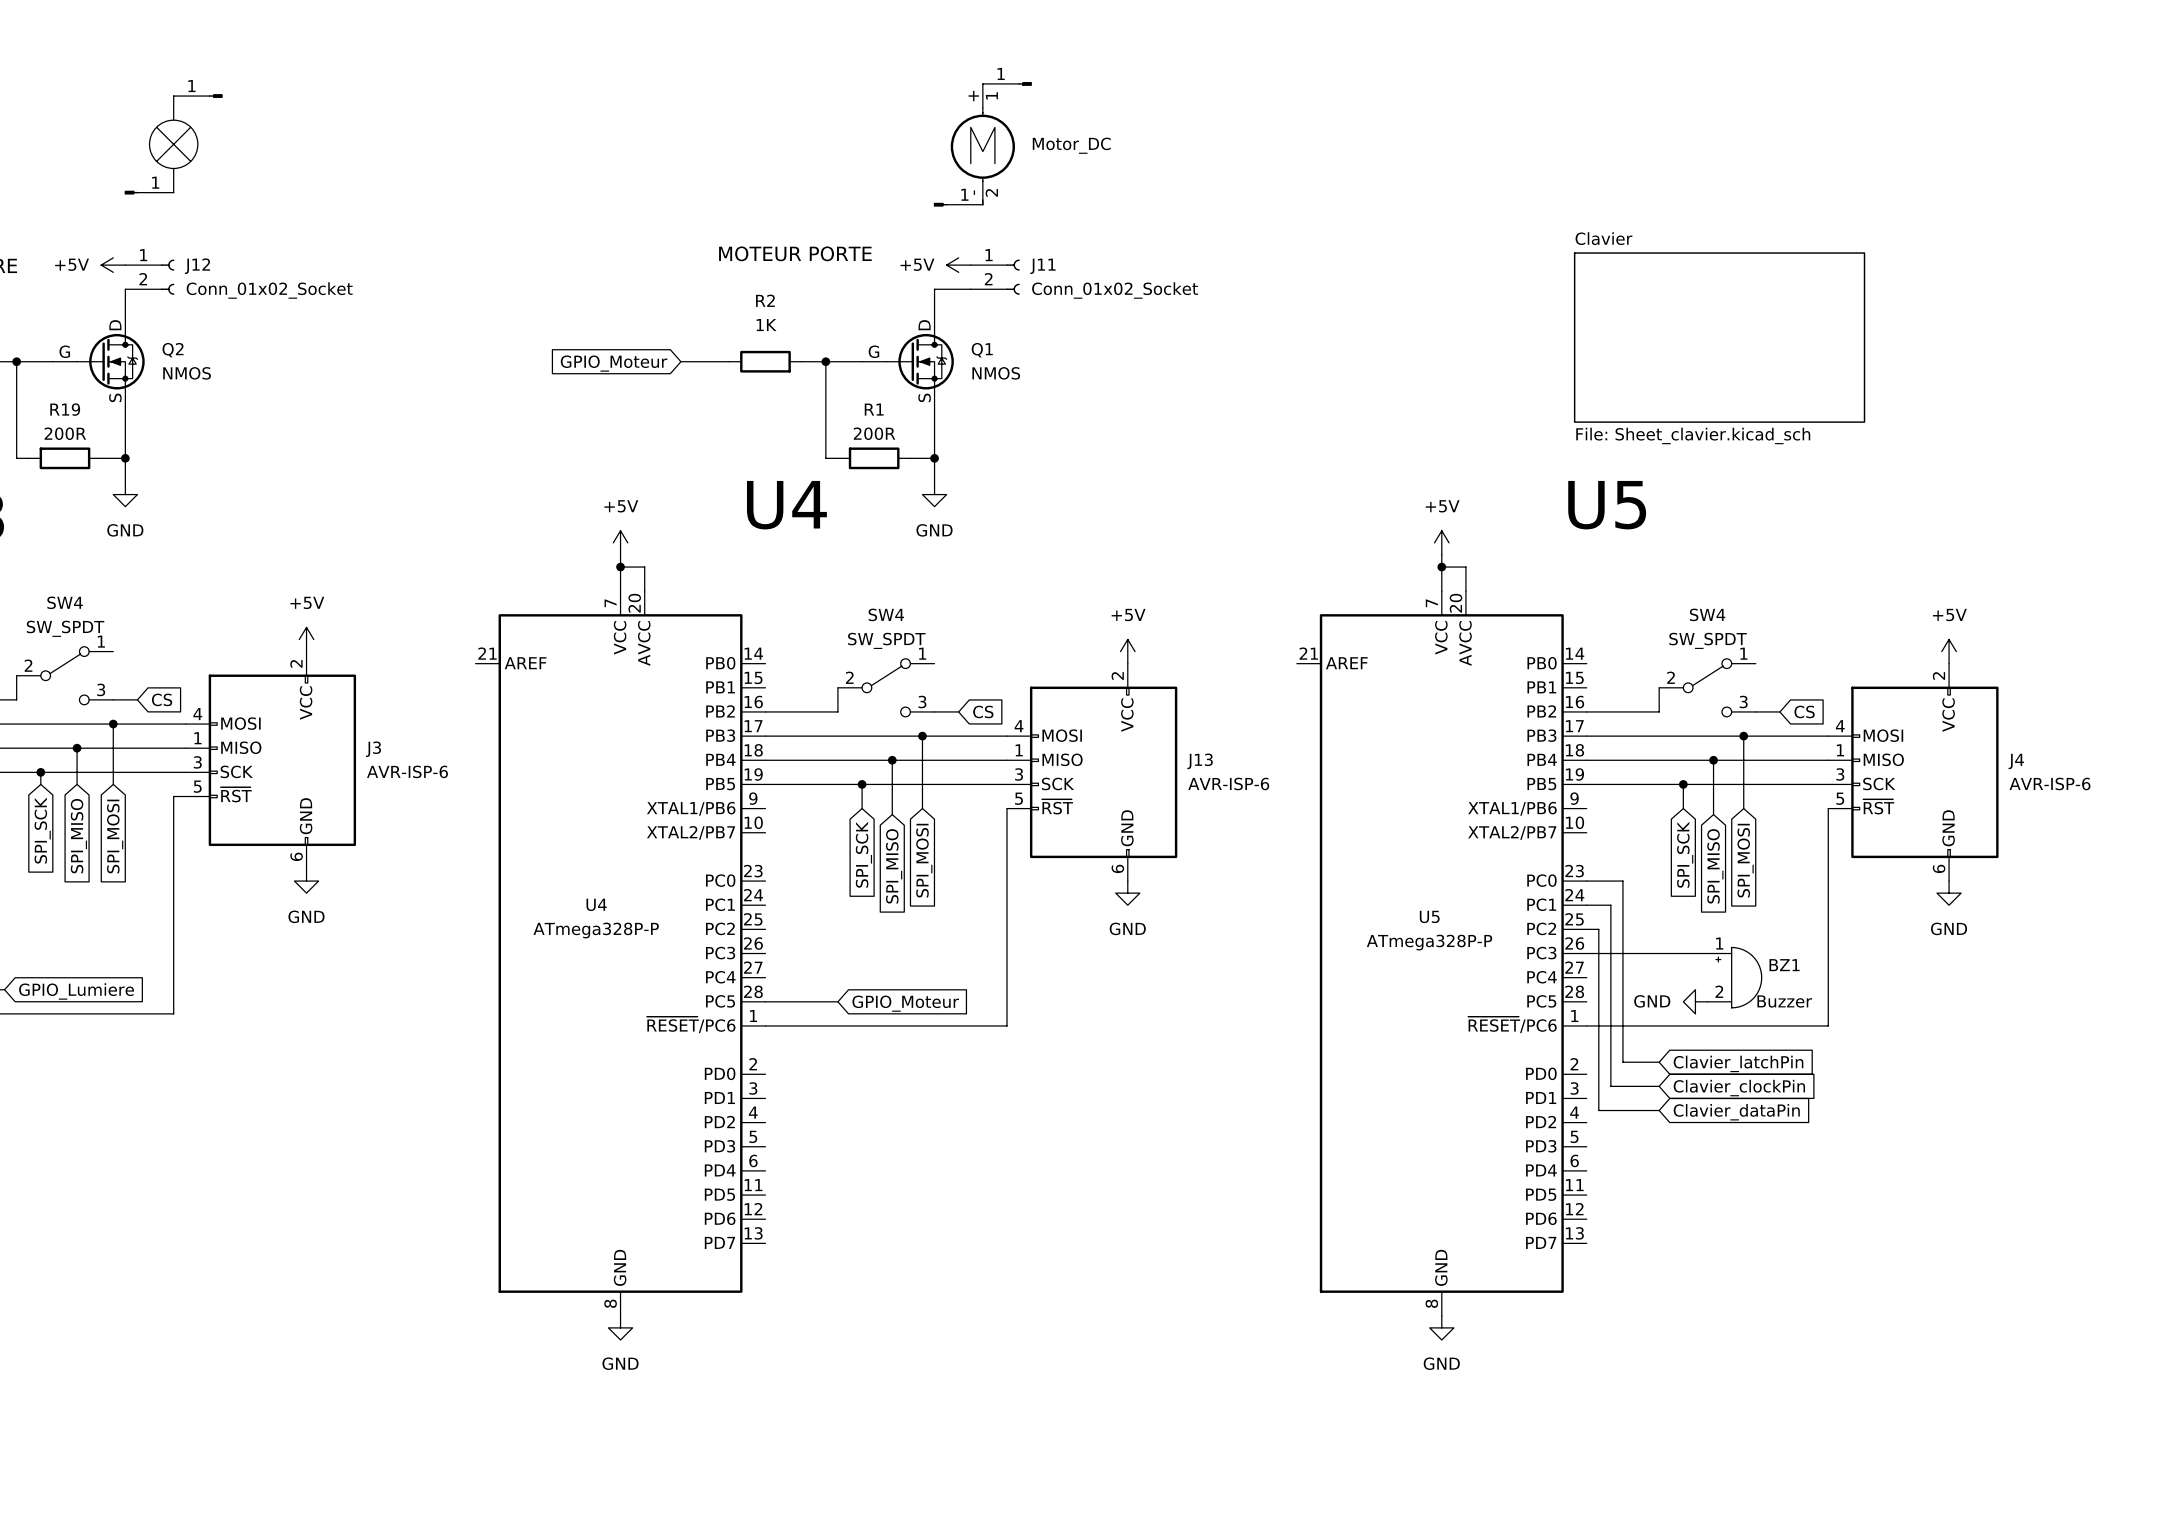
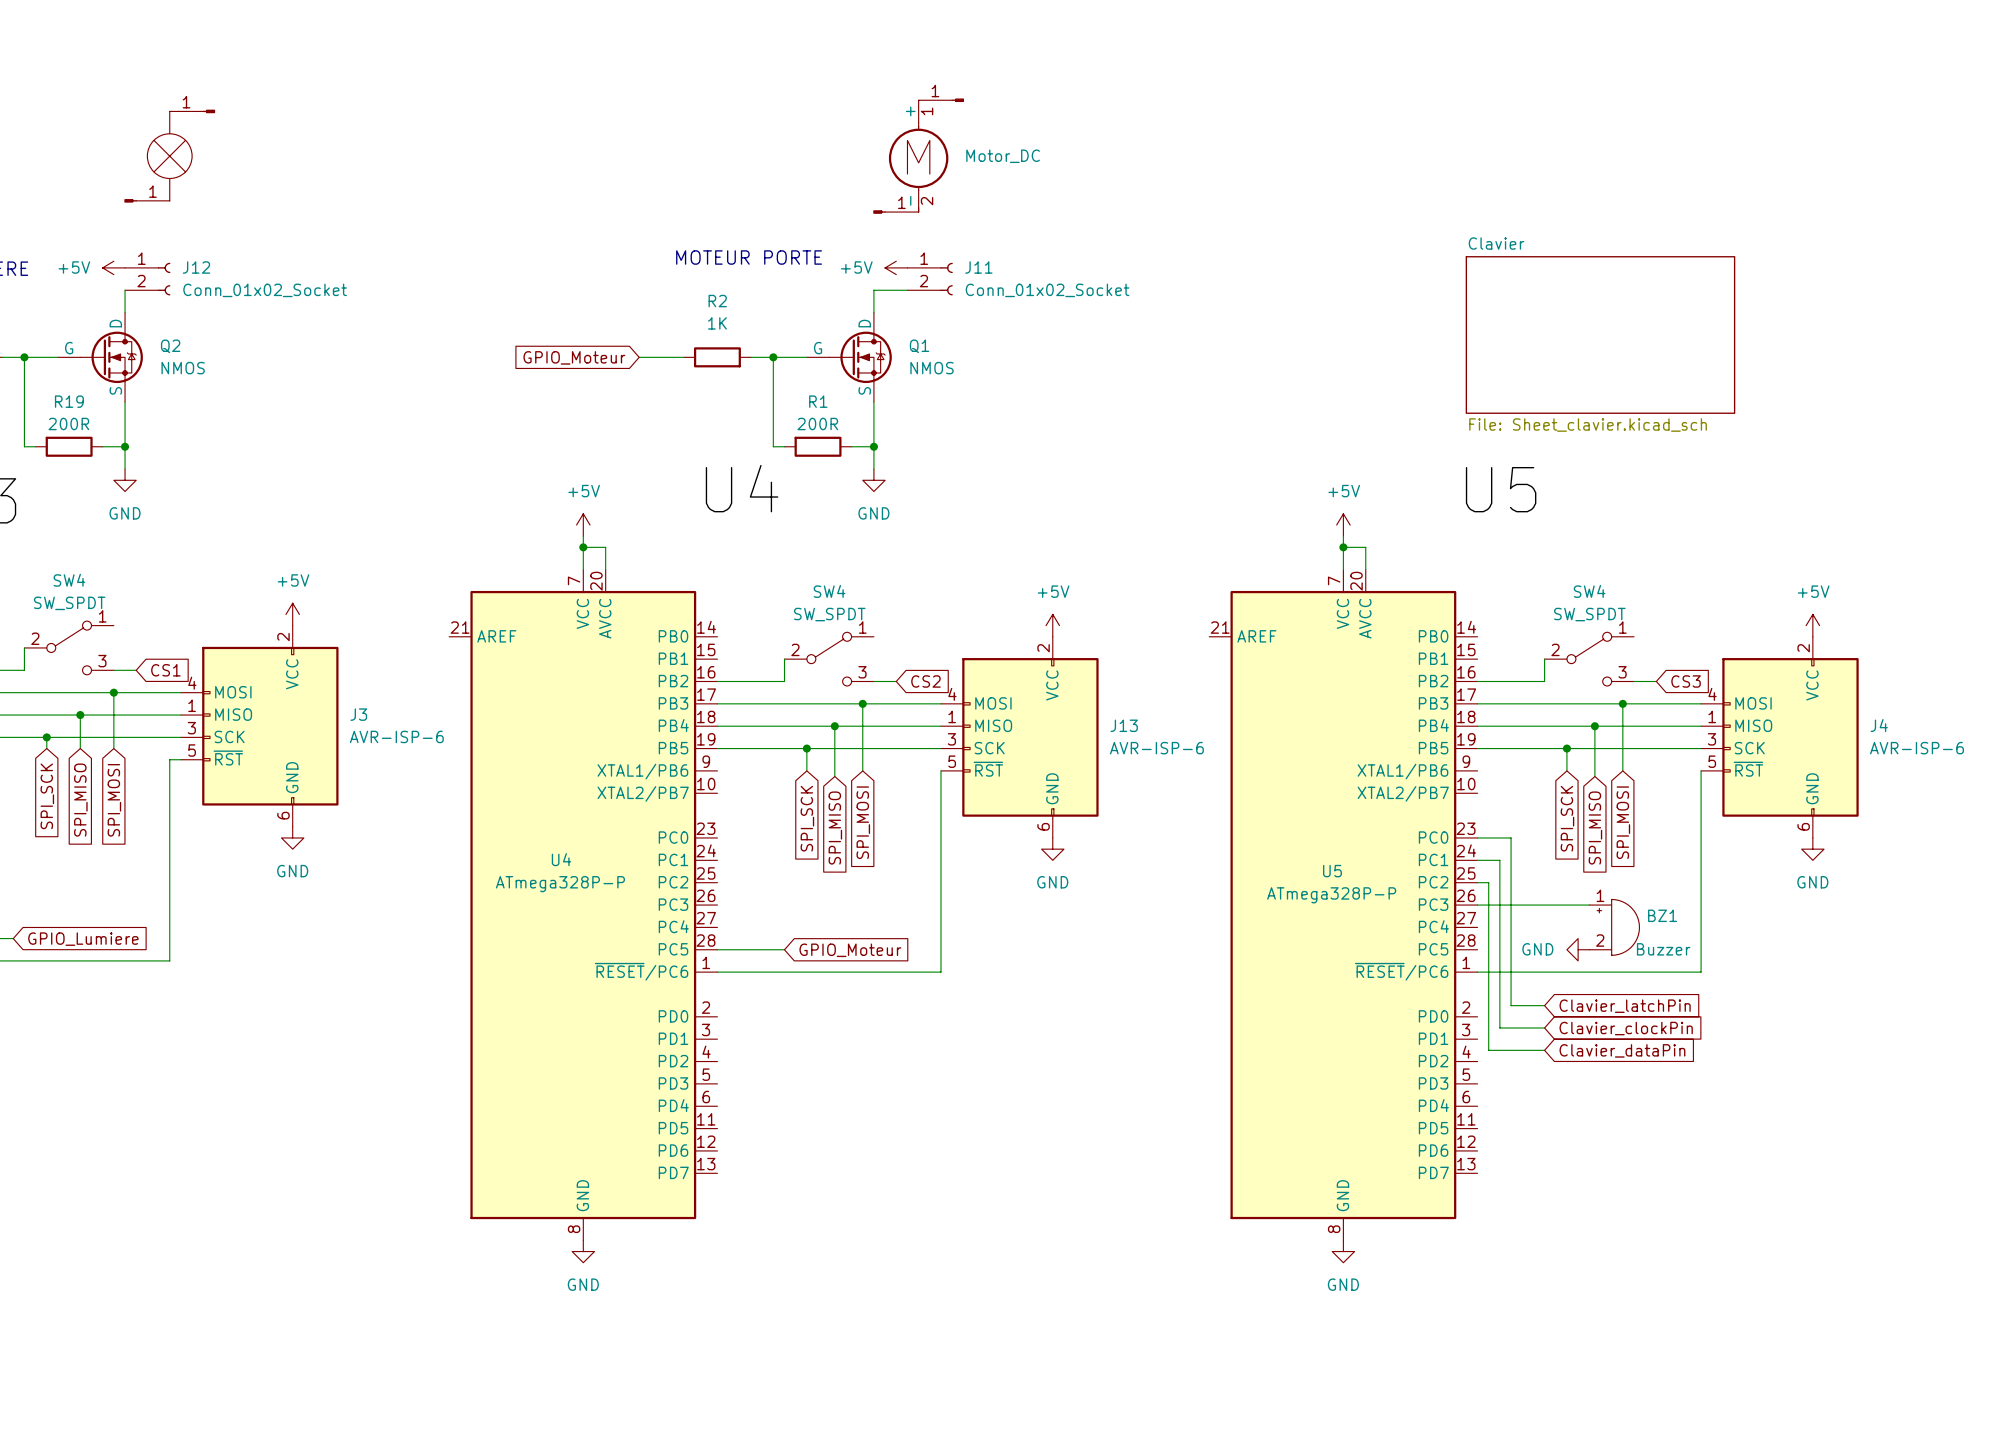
global label: CS (162, 699) -> CS1 (165, 670)
global label: CS (983, 711) -> CS2 (925, 681)
global label: CS (1804, 711) -> CS3 (1686, 681)

